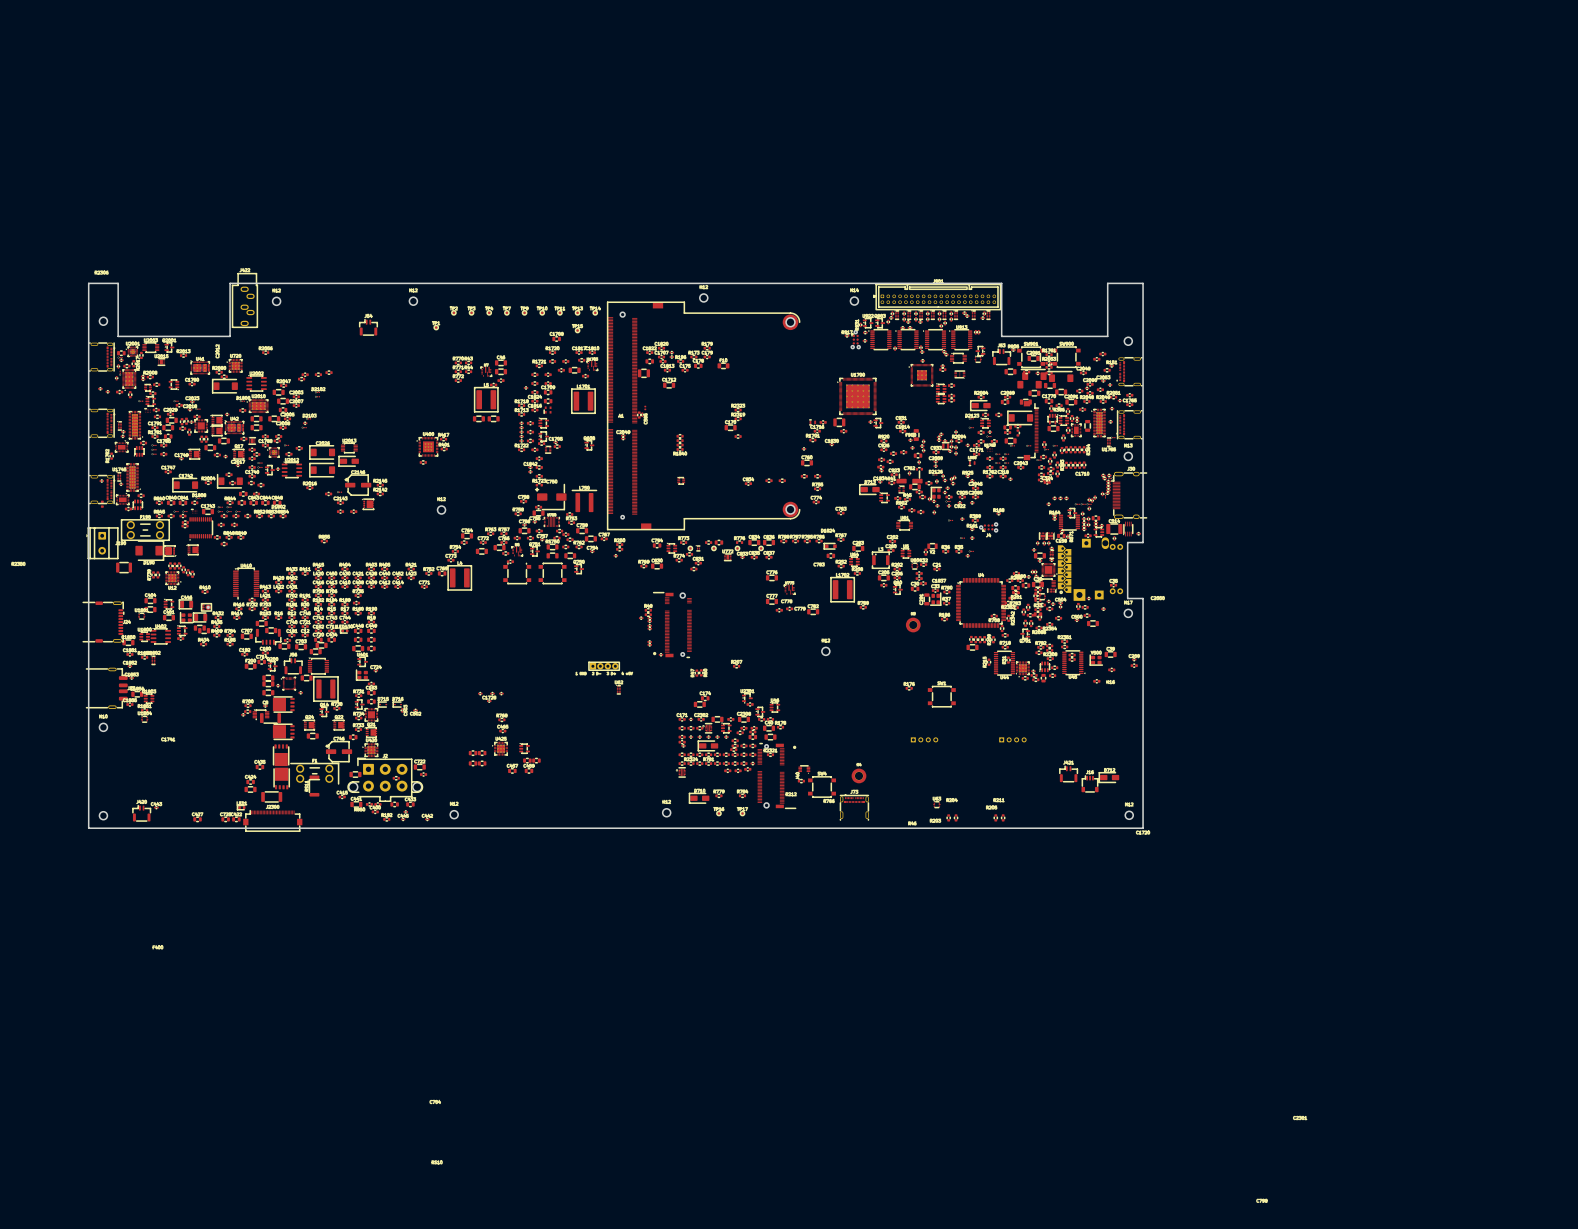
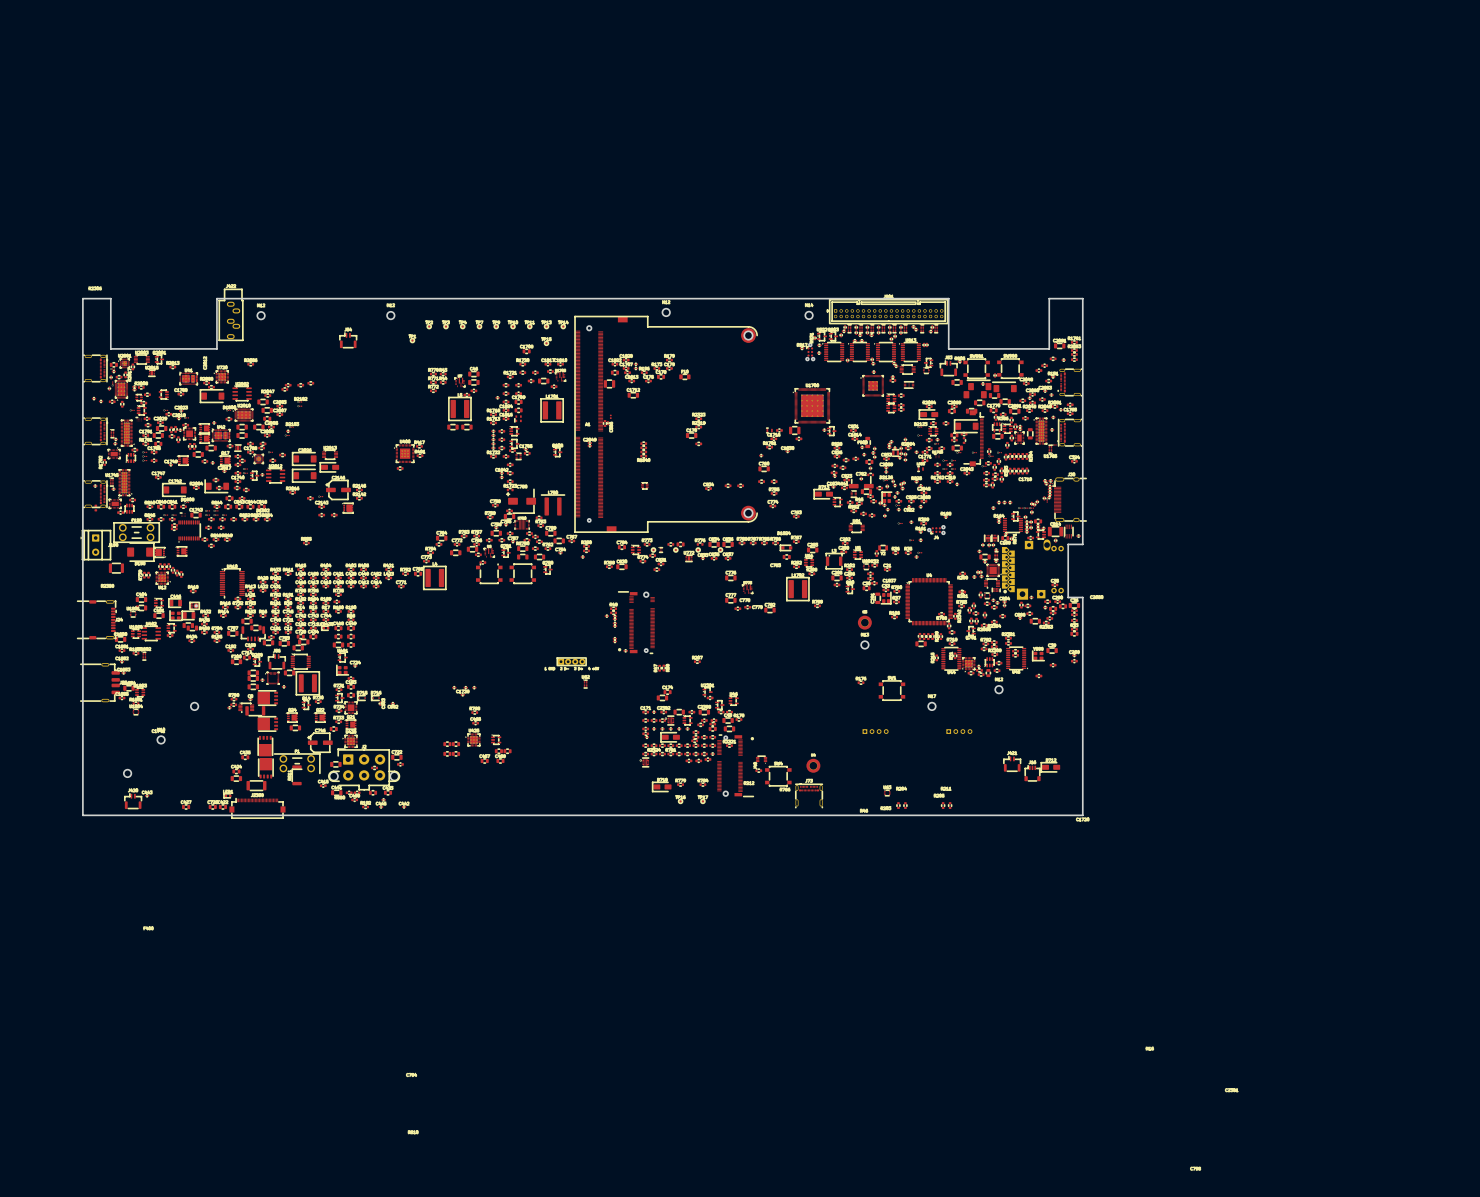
part position: (103, 321) -> (194, 706)
part: (1128, 341) -> none
part: none -> (1074, 354)
part: none -> (1053, 358)
part: none -> (1074, 359)
part: none -> (1063, 360)
part position: (1049, 354) -> (1074, 342)
part position: (1033, 358) -> (1059, 345)
part position: (1049, 363) -> (1074, 350)
part: (1049, 367) -> none
part: (1026, 372) -> none
part: (1049, 372) -> none
part position: (1128, 456) -> (864, 644)
part position: (1047, 482) -> (1074, 461)
part: (441, 510) -> none
part position: (1009, 580) -> (1047, 601)
part position: (1020, 580) -> (1057, 601)
part position: (1037, 584) -> (1074, 605)
part: (1025, 585) -> none
part: (1015, 588) -> none
part: (1037, 590) -> none
part: (1037, 594) -> none
part: (1012, 598) -> none
part: (1037, 600) -> none
part position: (1008, 602) -> (1046, 622)
part: none -> (1063, 606)
part position: (1037, 609) -> (1074, 629)
part: none -> (1053, 608)
part: none -> (1074, 610)
part position: (1128, 613) -> (931, 706)
part: (1037, 614) -> none
part: none -> (1053, 612)
part: none -> (1074, 614)
part: none -> (1049, 618)
part: none -> (1074, 620)
part: none -> (1074, 633)
part: (825, 651) -> none
part: none -> (998, 689)
part position: (103, 727) -> (161, 739)
part: (666, 812) -> none
part: (454, 814) -> none
part position: (103, 815) -> (127, 773)
part: (1129, 815) -> none

